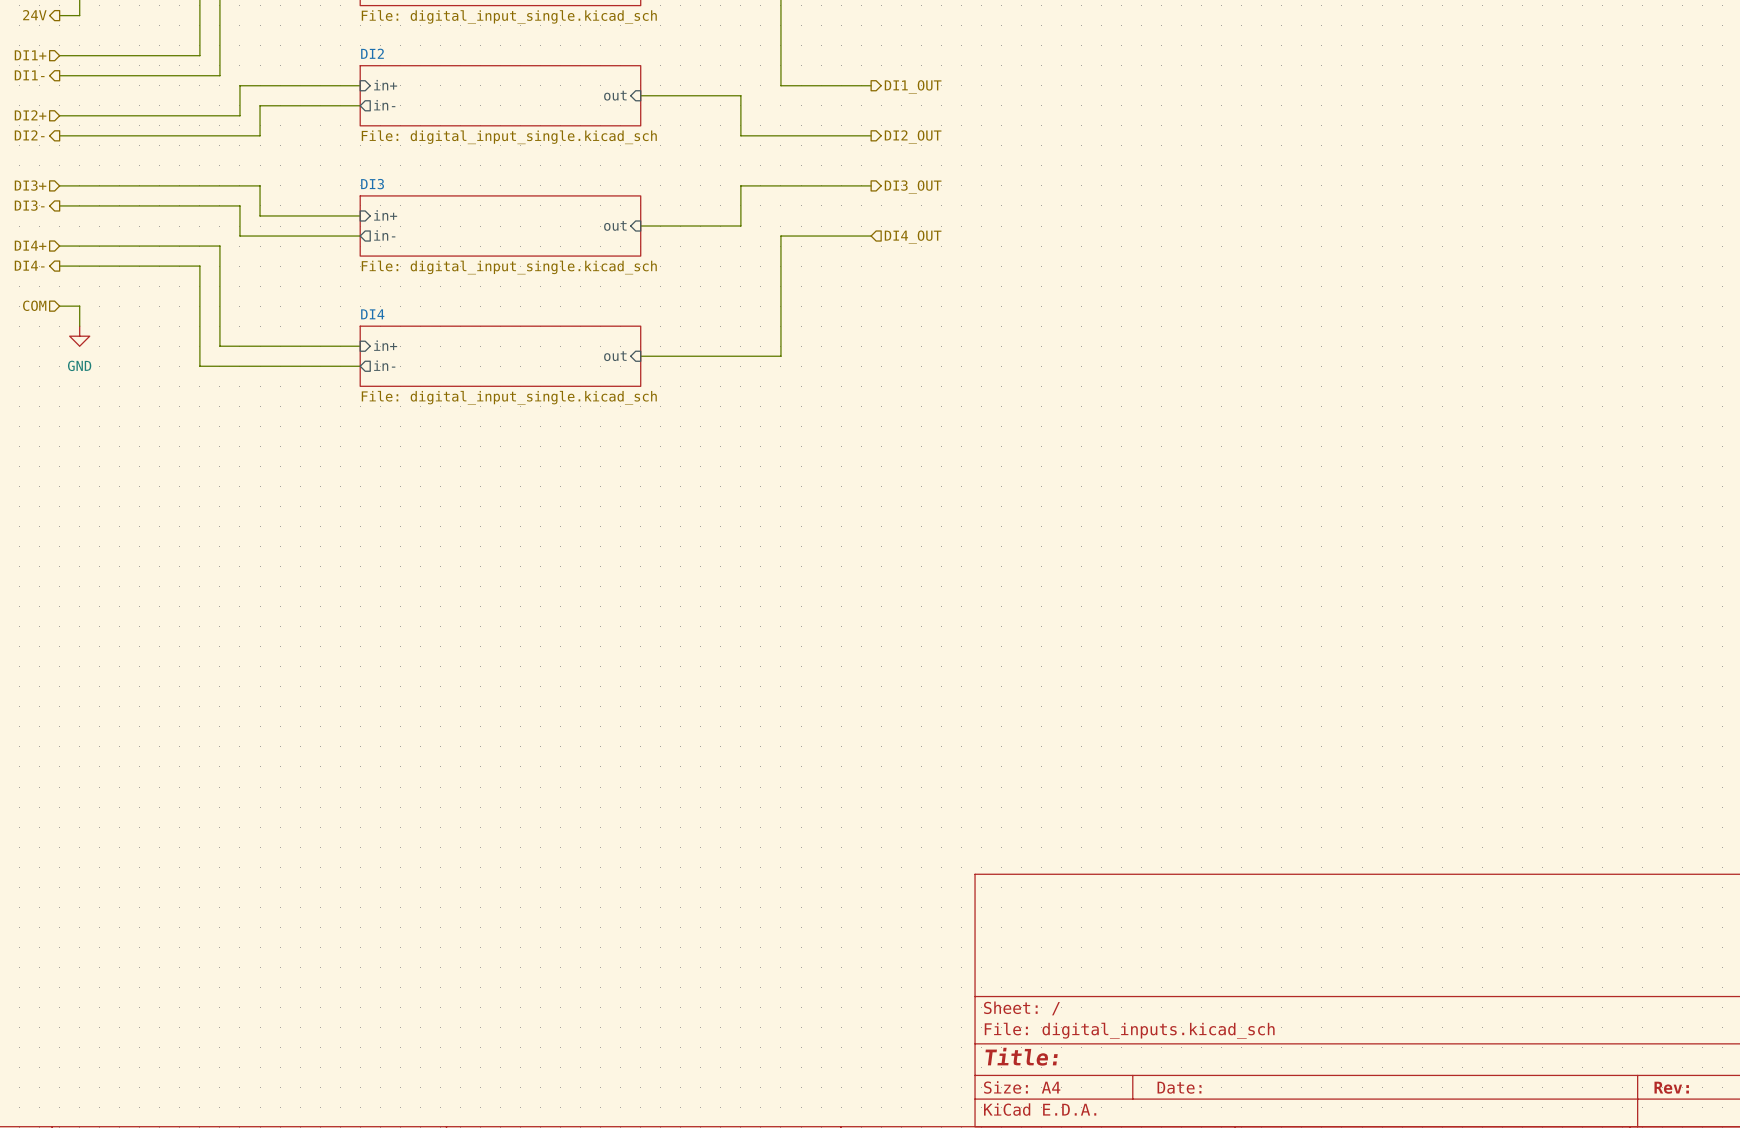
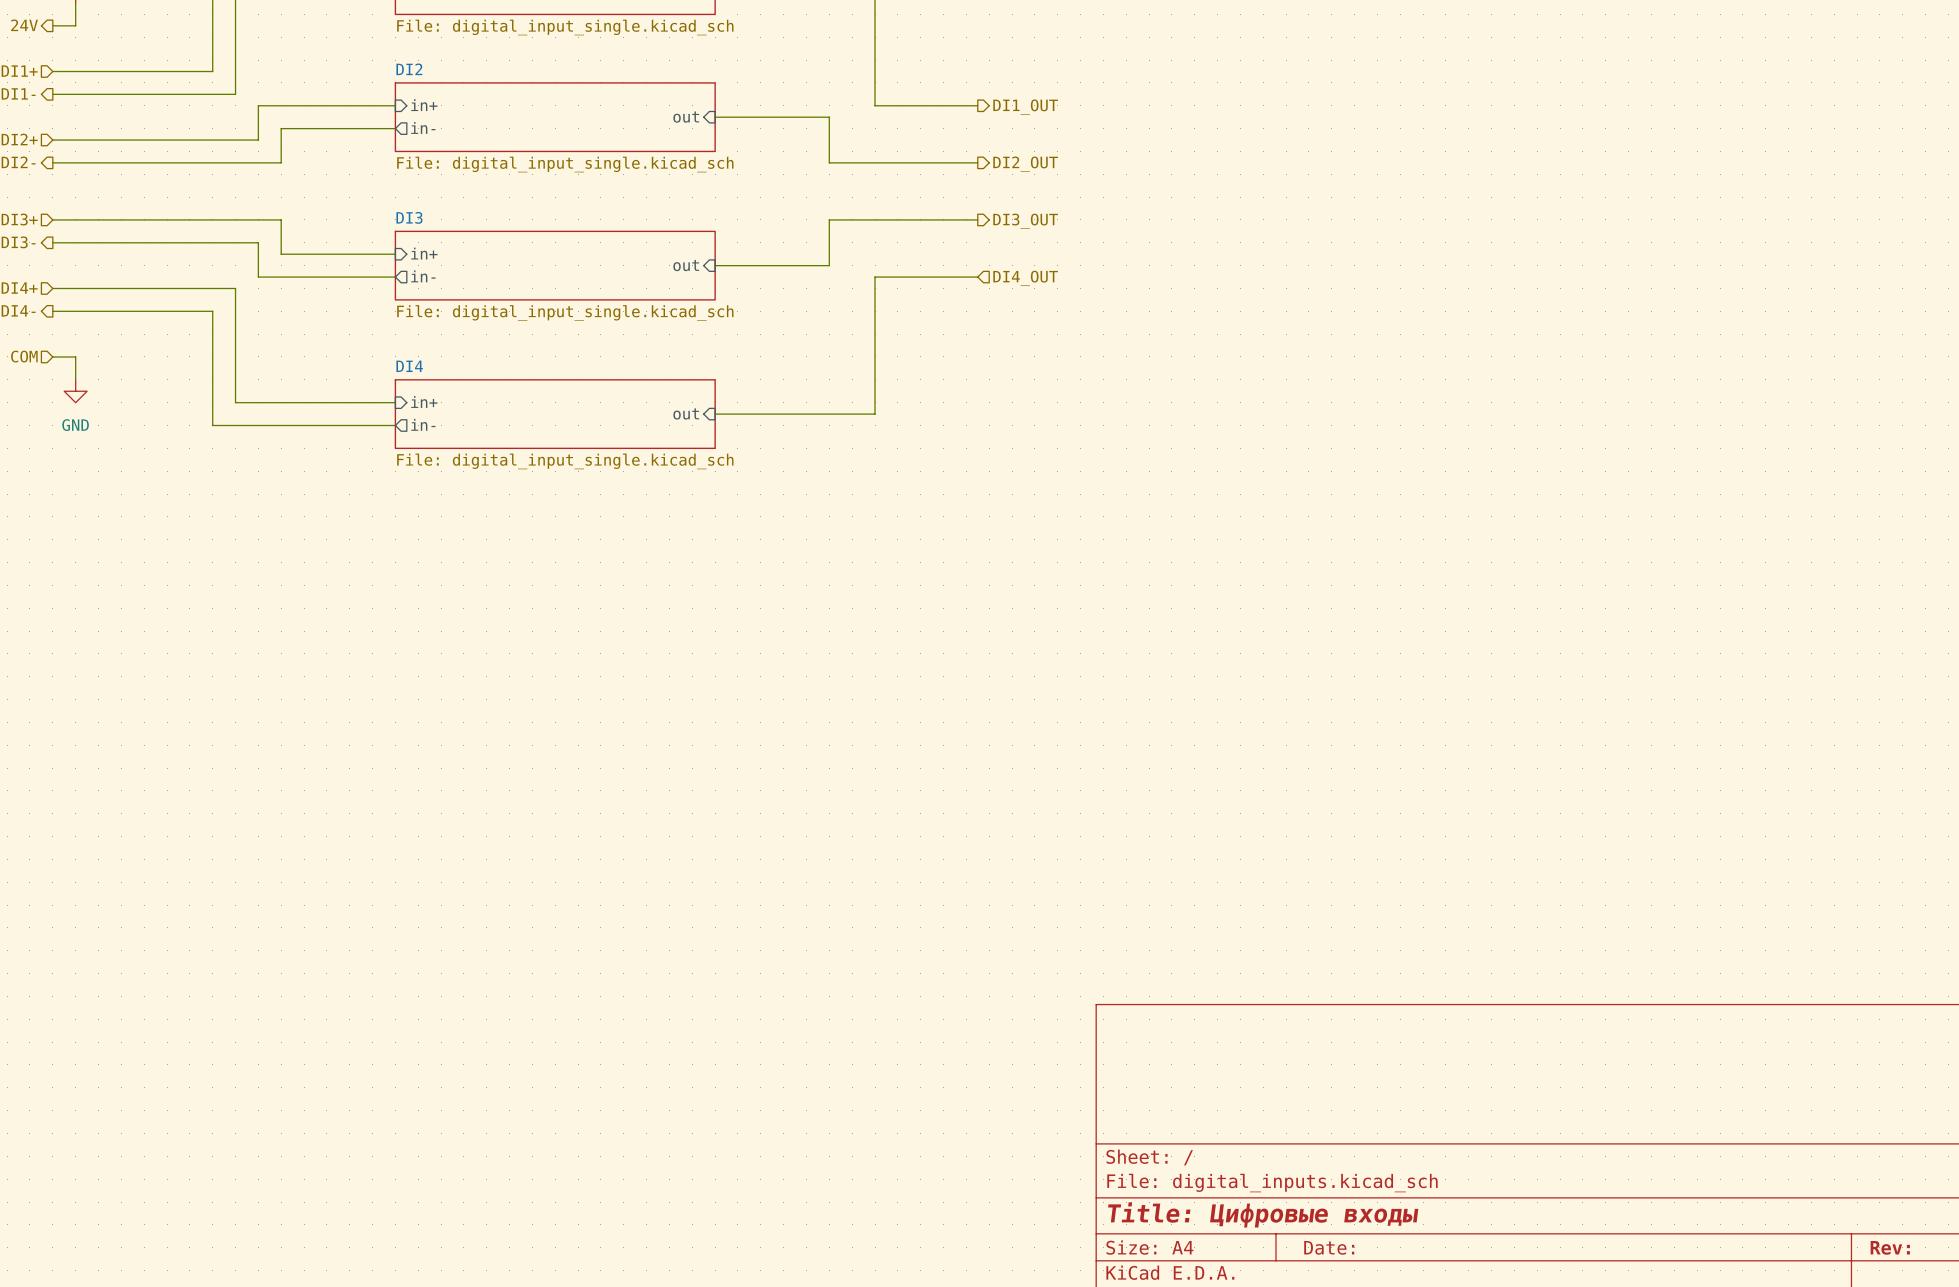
title block: Title: (1021, 1056) -> Title: Цифровые входы (1263, 1214)

